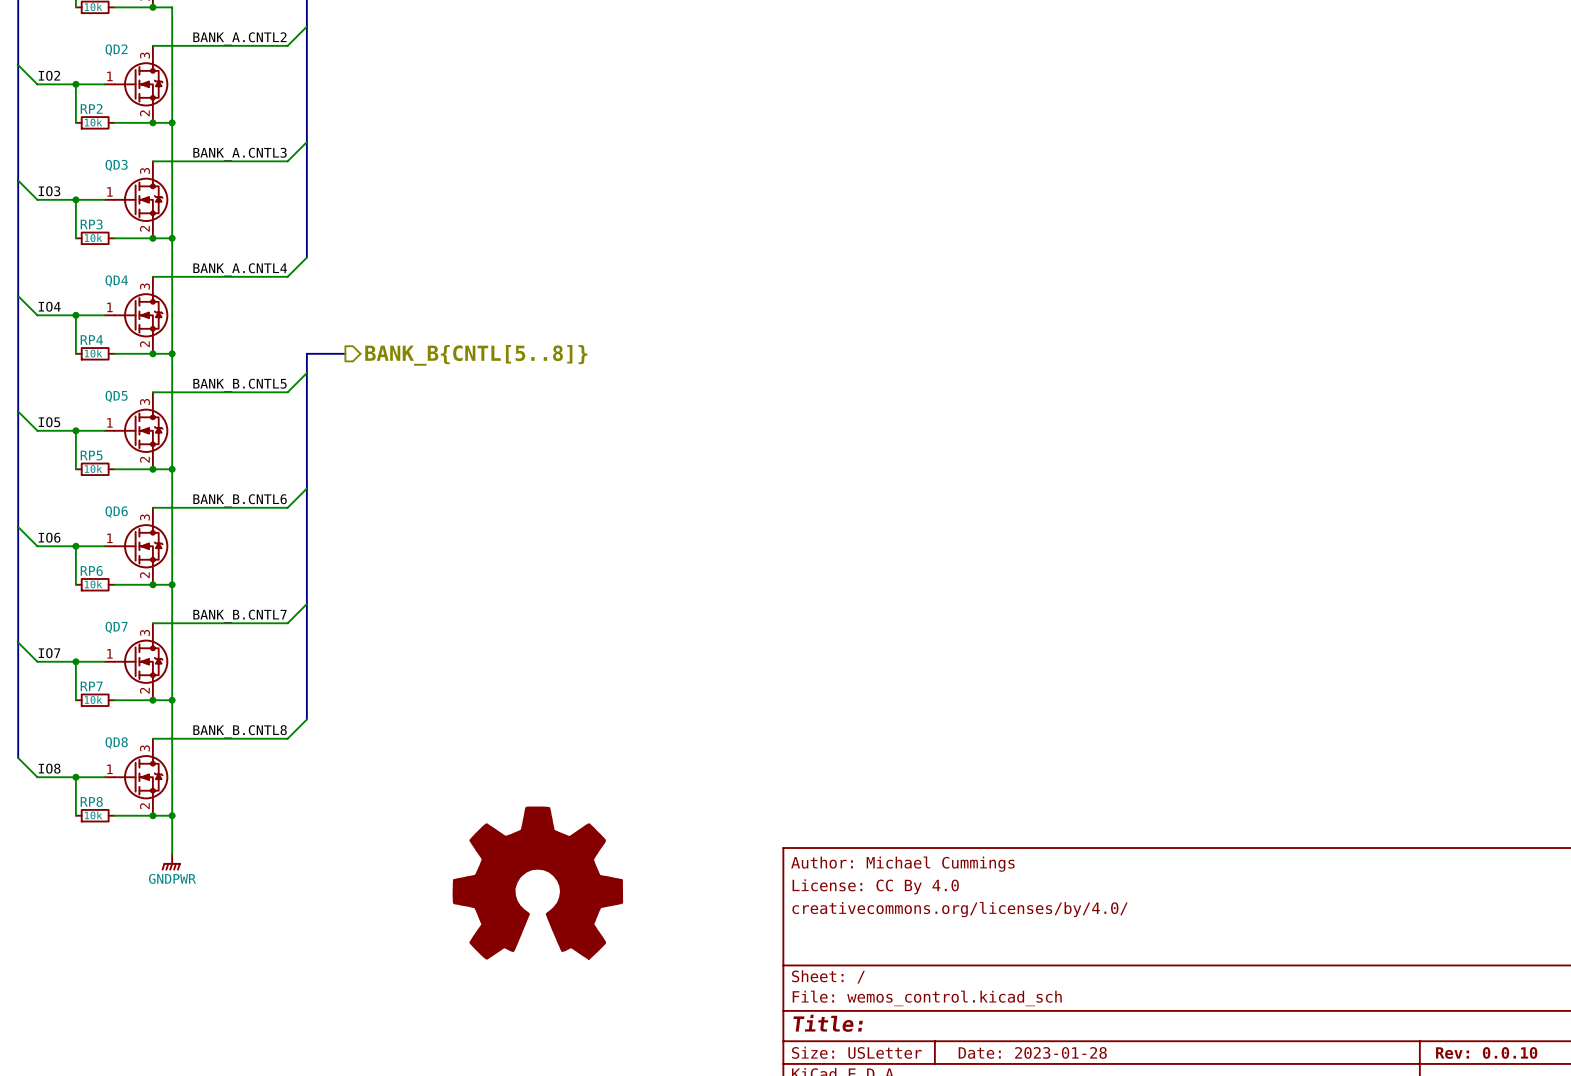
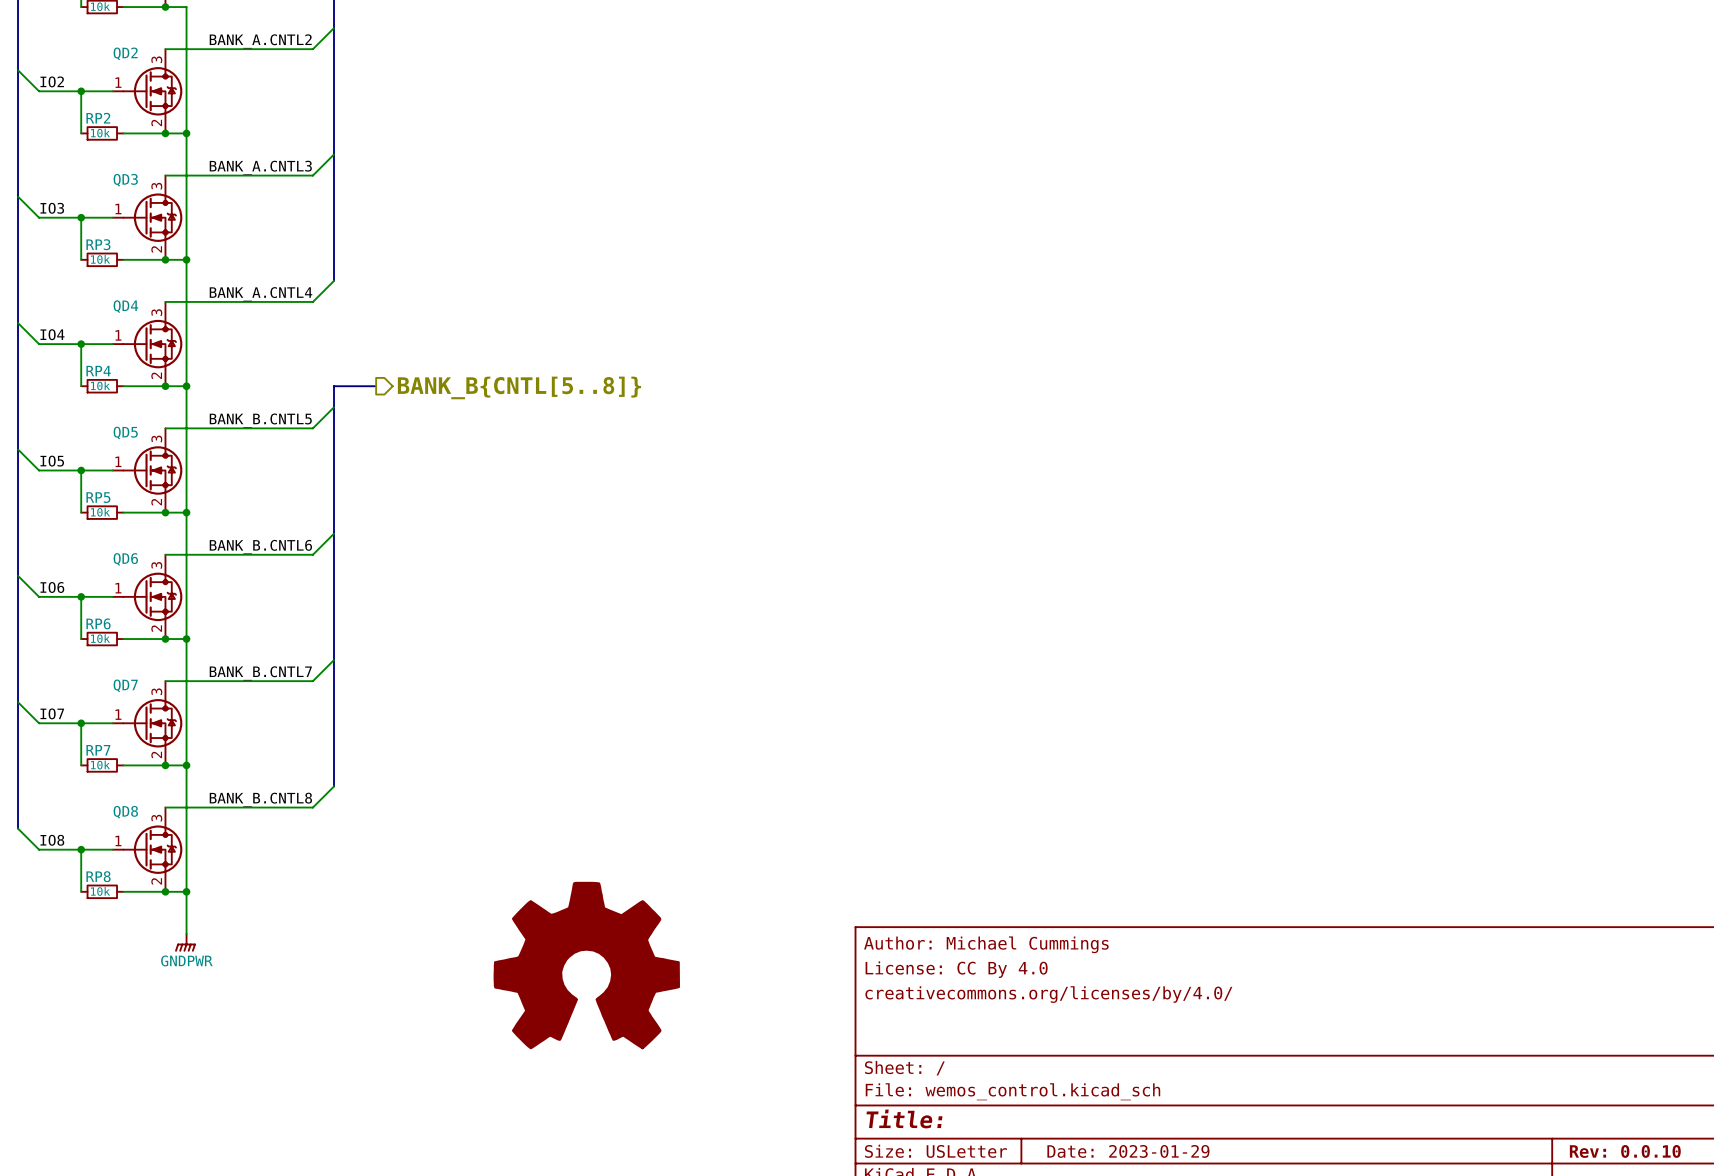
title block: Date: 2023-01-28 (1032, 1052) -> Date: 2023-01-29 (1128, 1151)

